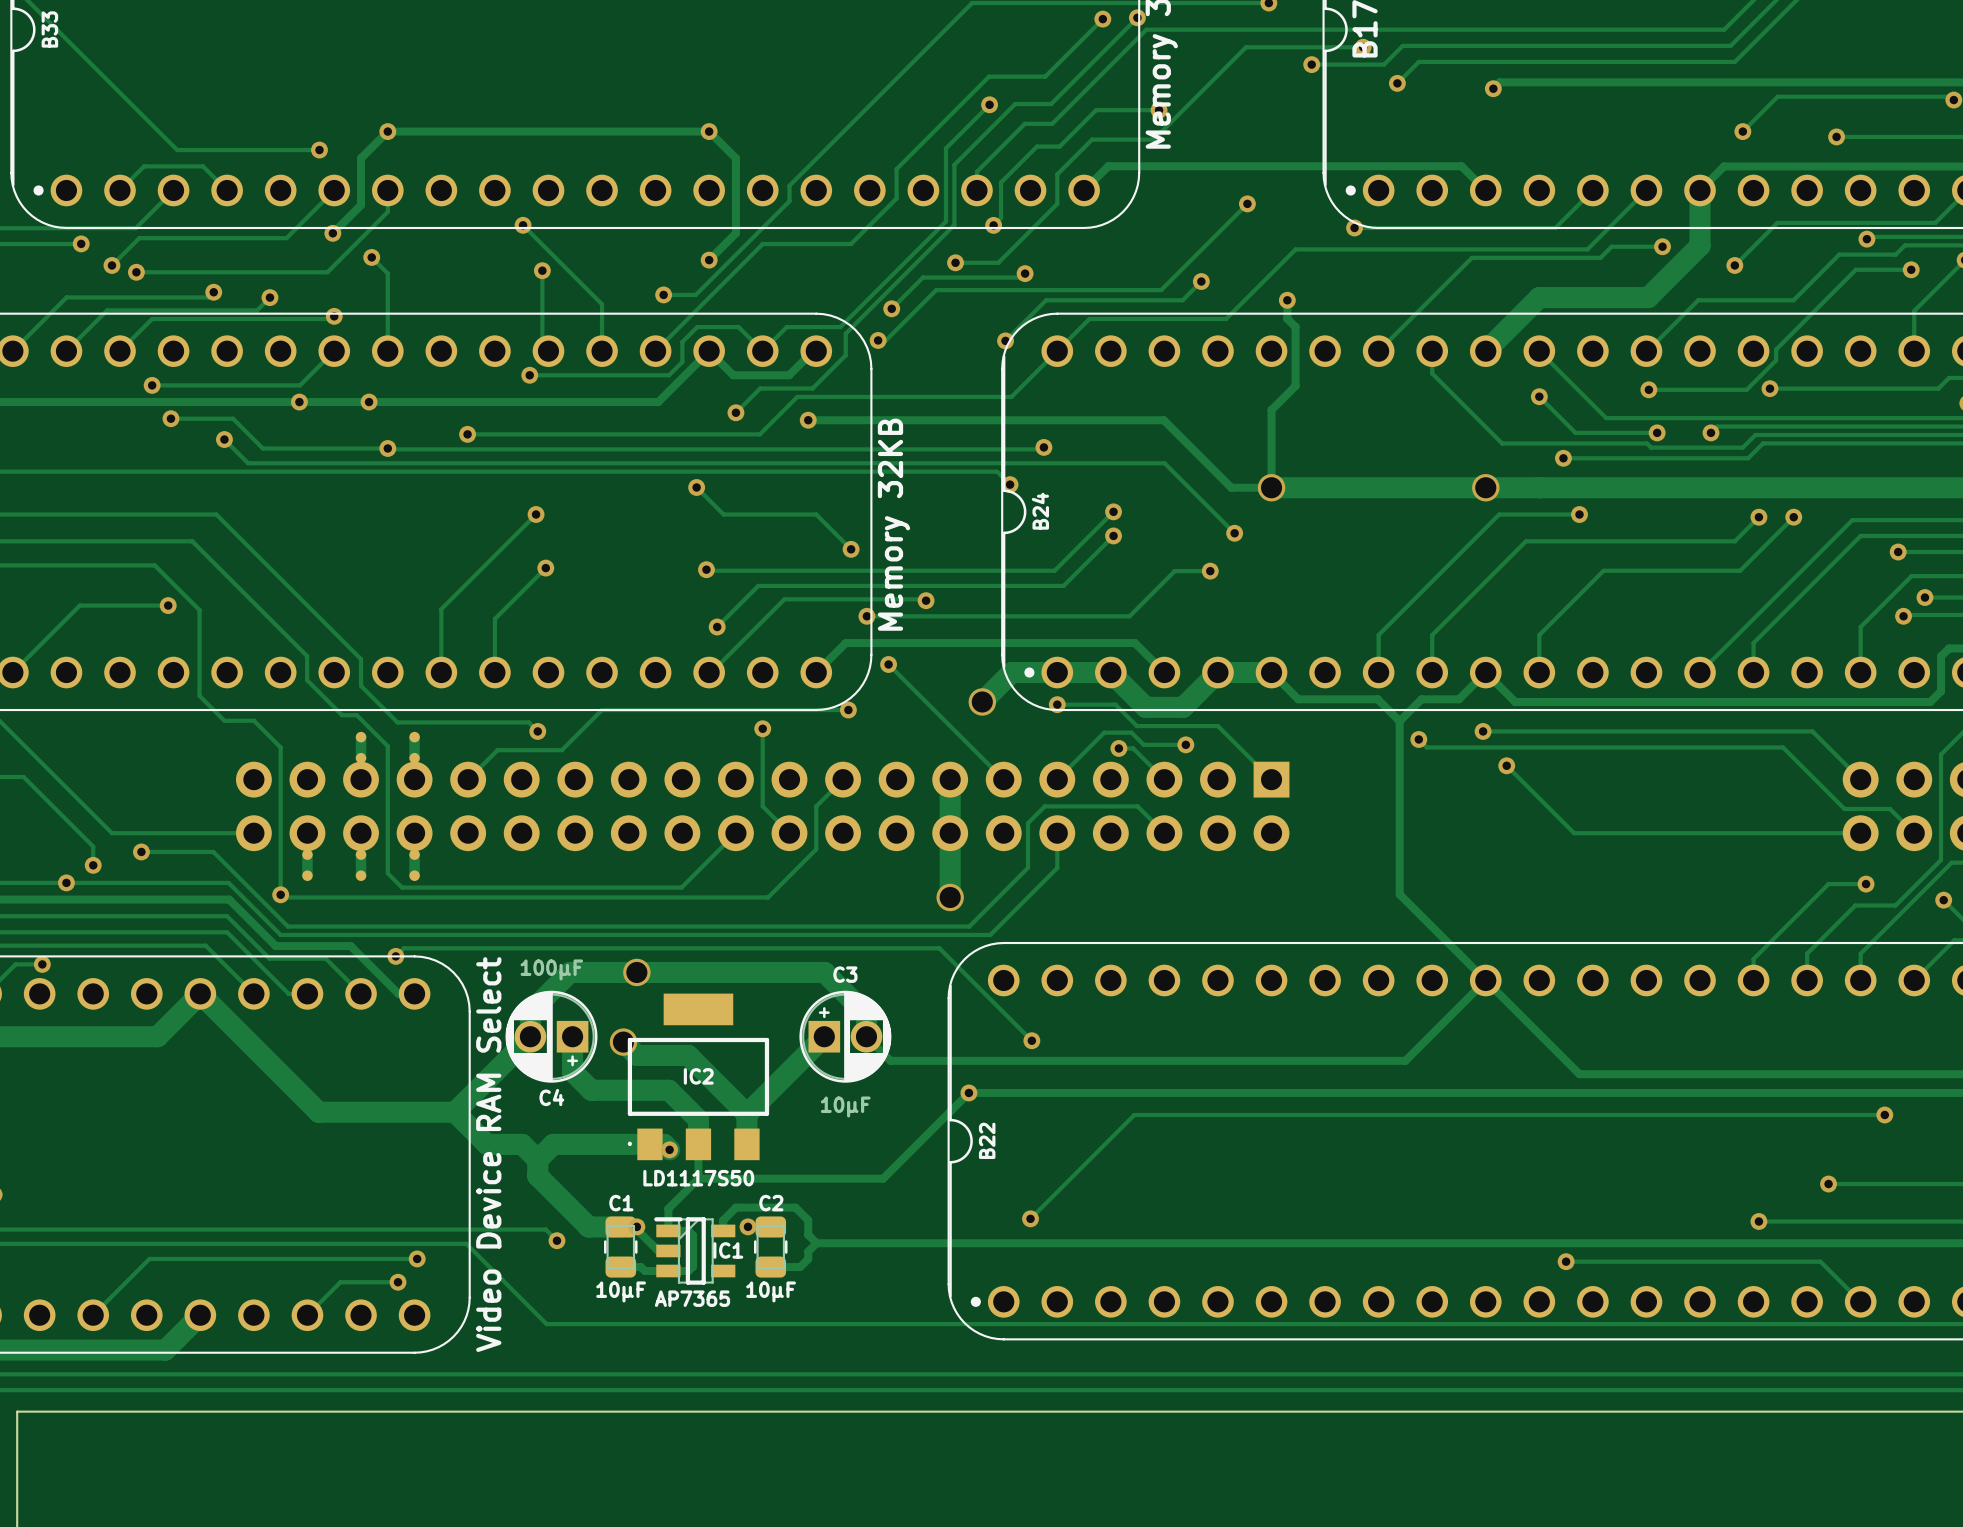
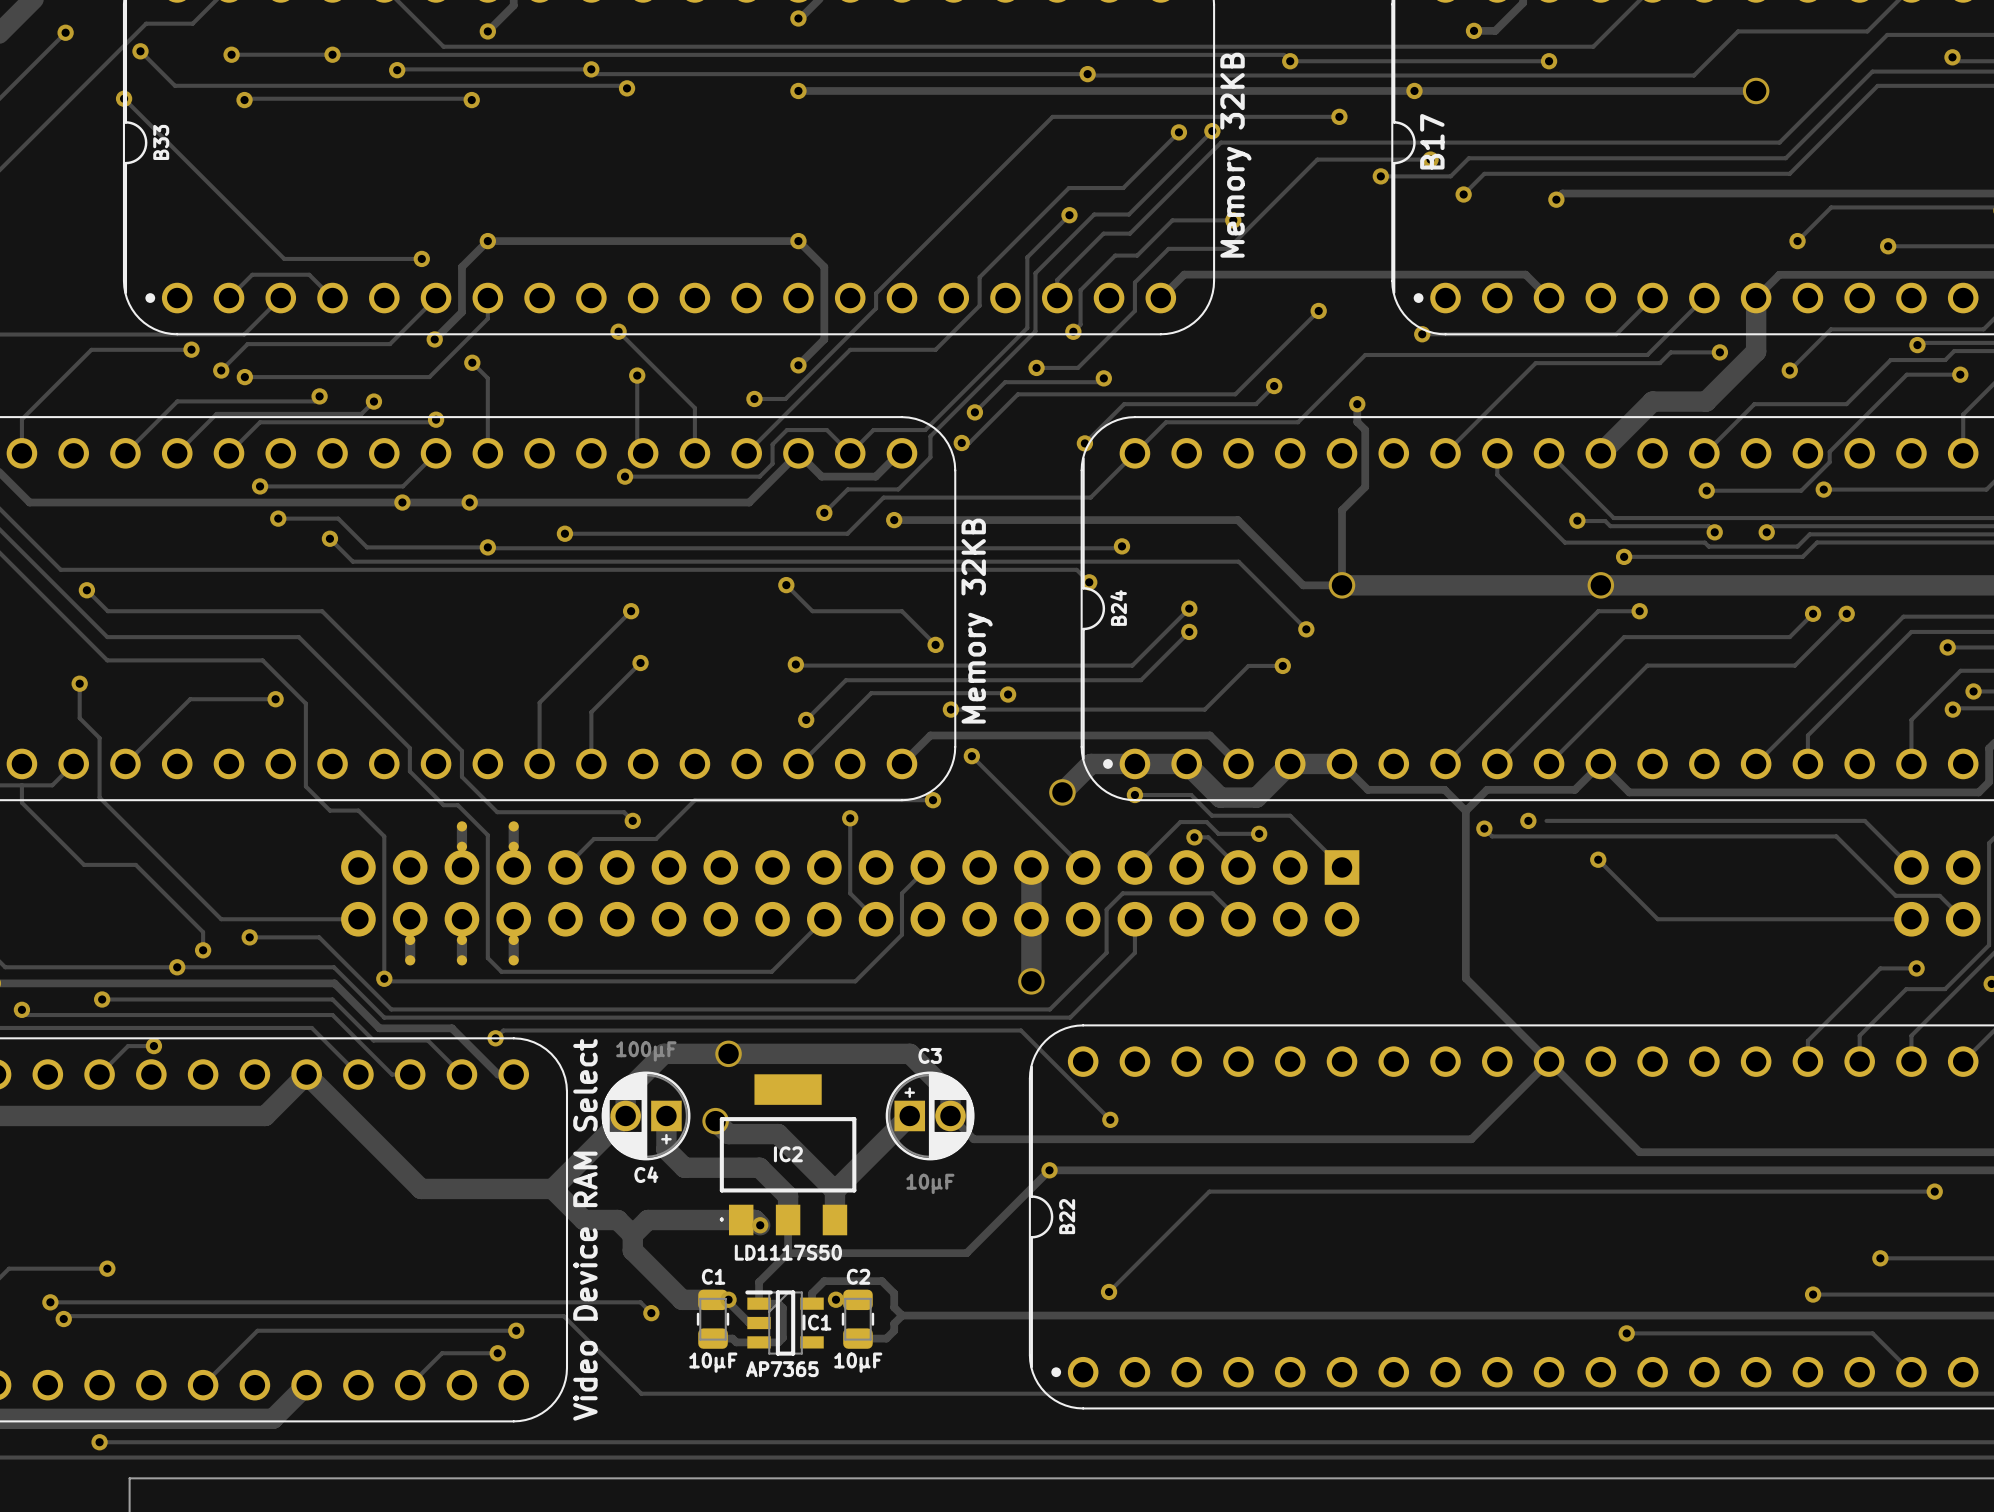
track: (1592, 297) (1539, 297) (1485, 351) -> (1652, 401) (1600, 453)
track: (1539, 351) (1606, 418) -> (1549, 453) (1613, 518) (1665, 518)
track: (1539, 396) (1575, 432) (1657, 432) -> (1577, 520) (1605, 521) (1610, 526) (1708, 526) (1714, 532)
via position: (1539, 396) -> (1577, 520)
via position: (1485, 487) -> (1600, 585)
track: (1536, 514) (1499, 514) (1378, 635) (1378, 672) -> (1598, 611) (1445, 763)
track: (1563, 541) (1525, 541) (1432, 635) (1432, 672) -> (1624, 637) (1497, 763)
track: (1603, 570) (1539, 635) (1539, 672) -> (1662, 665) (1647, 665) (1549, 763)
track: (1458, 699) (1485, 672) (1515, 701) (1568, 701) -> (1523, 789) (1574, 789) (1600, 763) (1629, 792)
via position: (1483, 731) -> (1528, 820)
track: (1506, 765) (1574, 833) (1598, 833) -> (1598, 859) (1657, 919)
via: (1506, 765) -> none
via: none -> (1598, 859)

